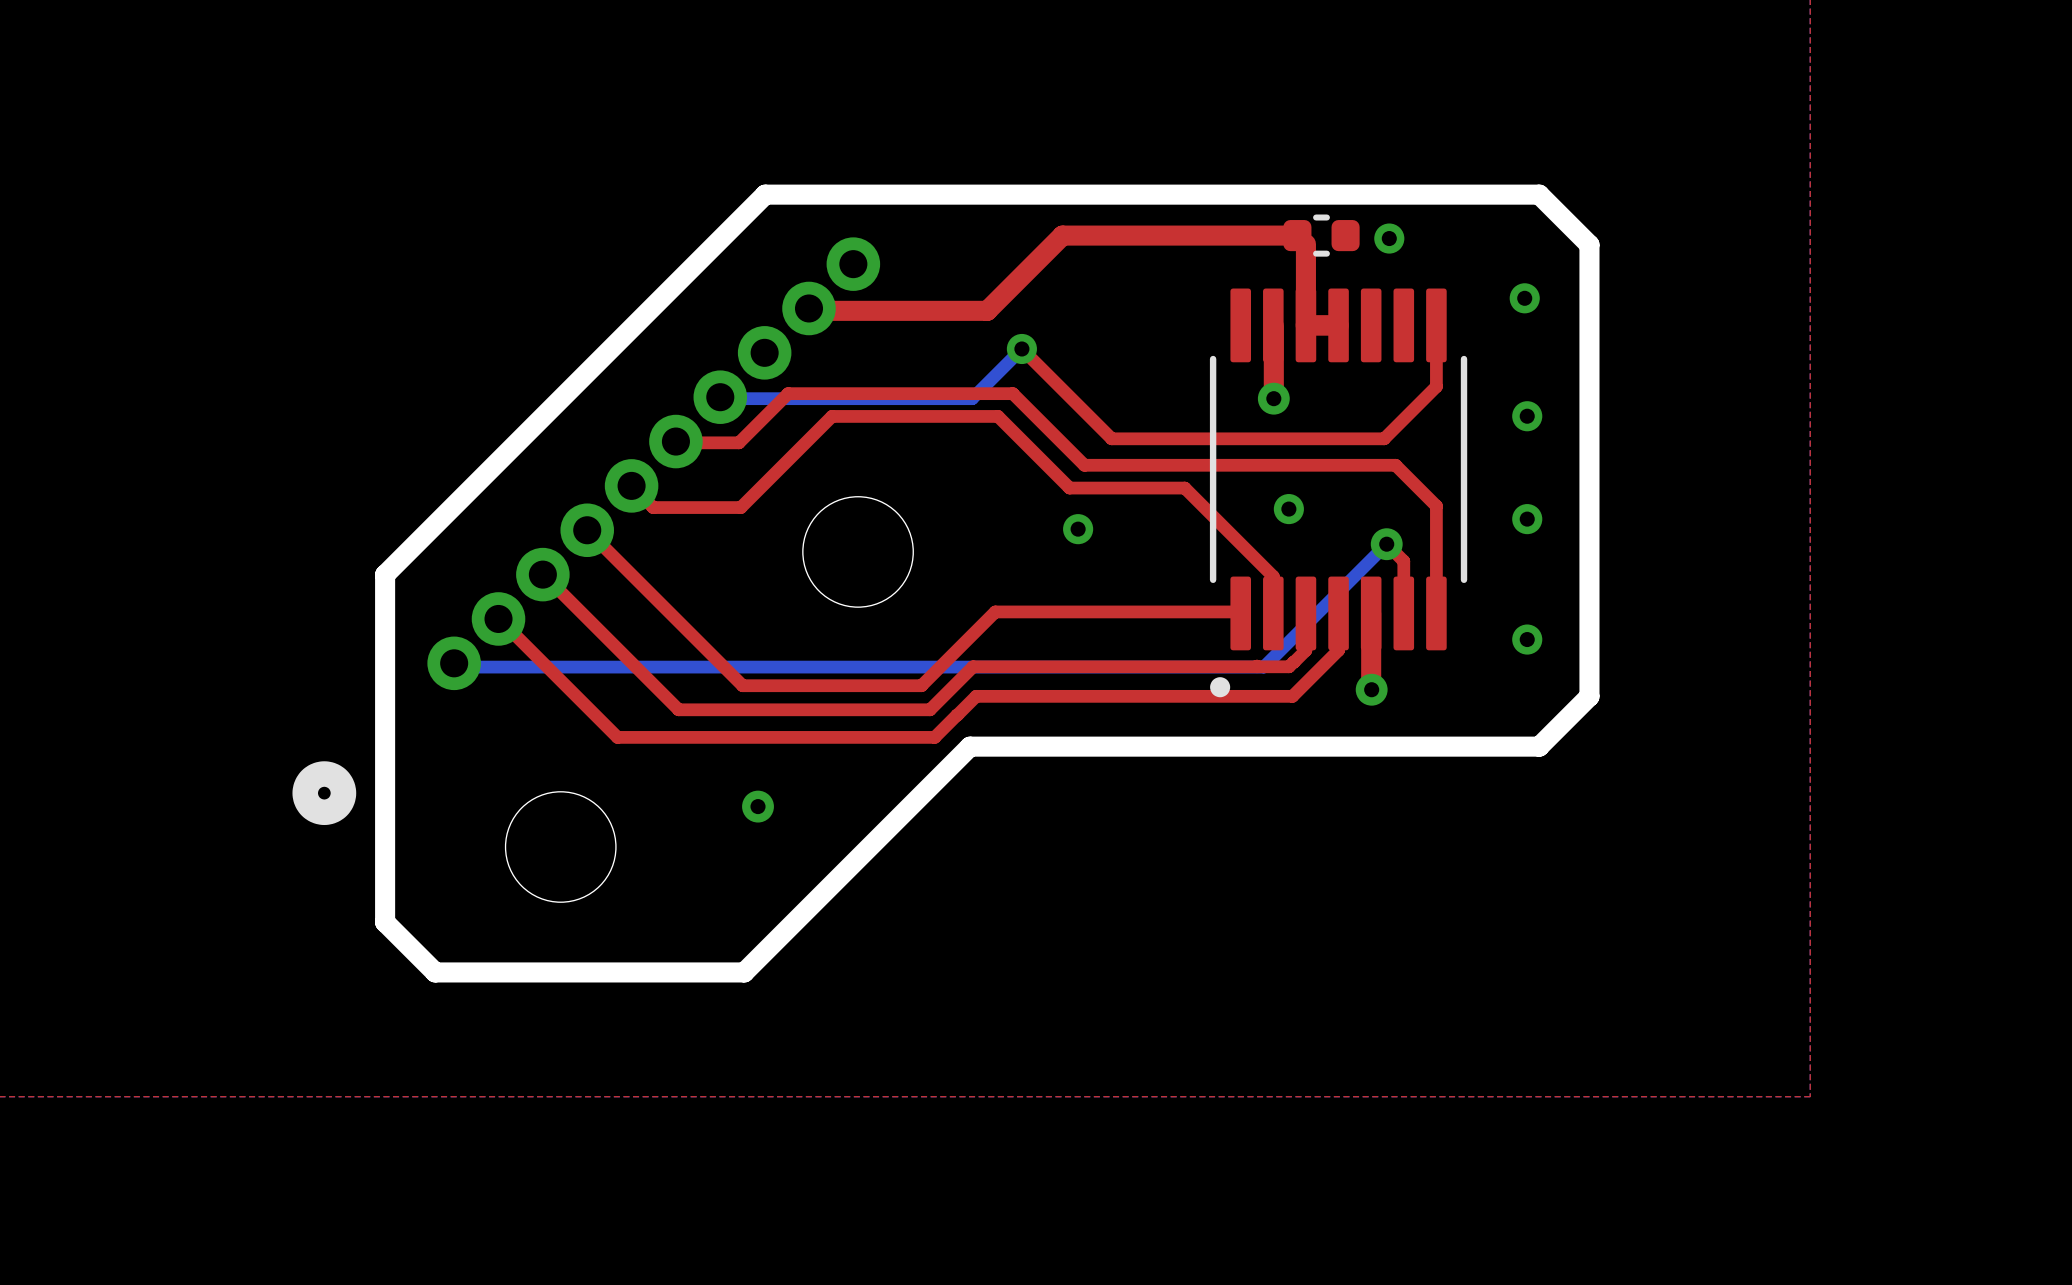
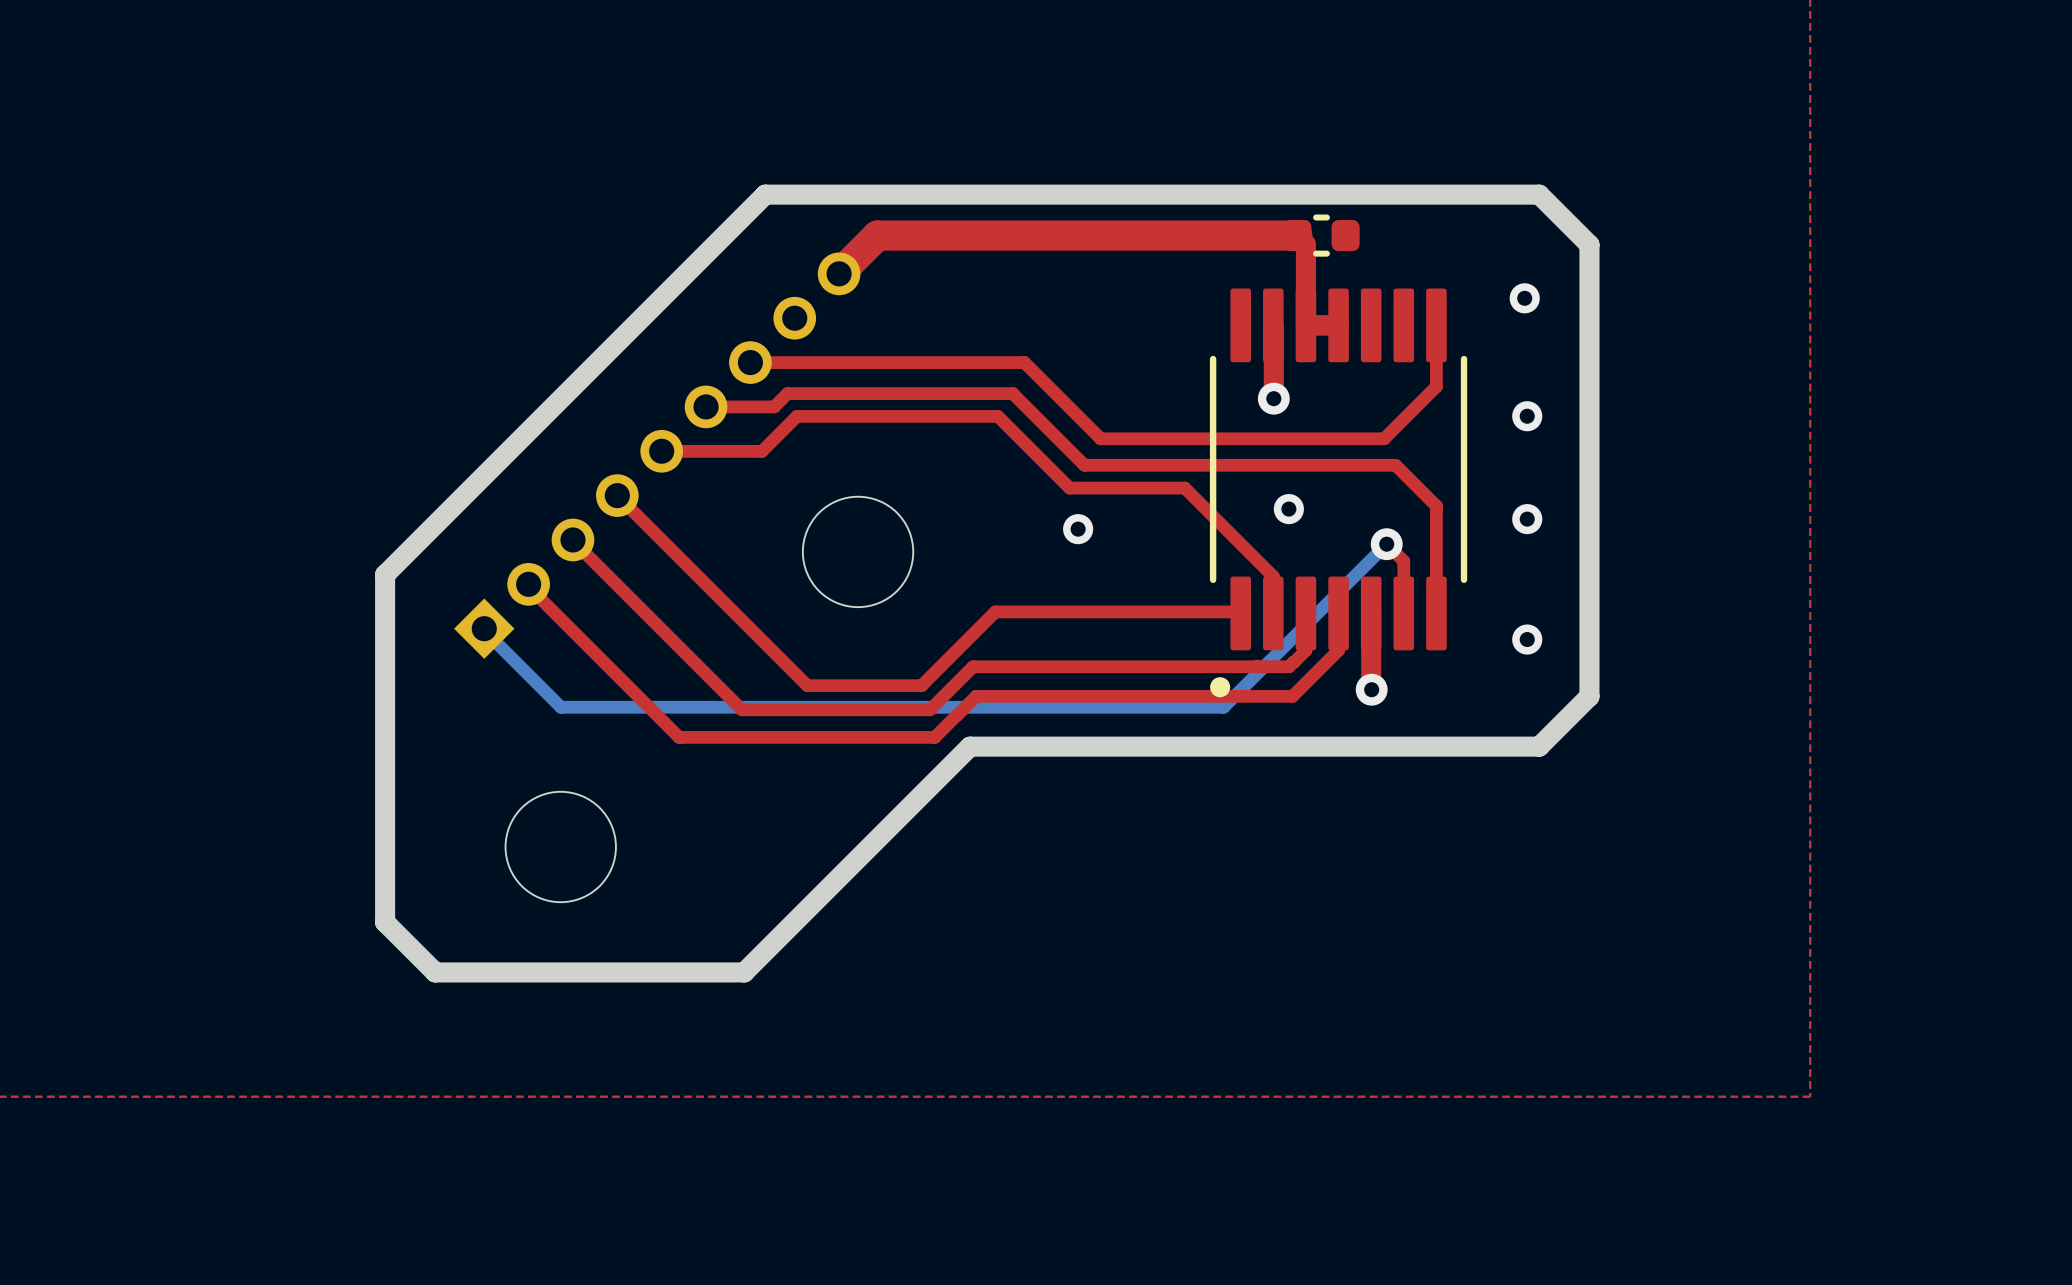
top track: (1062, 235) (987, 310) (811, 310) -> (1062, 235) (877, 235) (839, 273)
top track width: thin (1062, 235) (1297, 235) -> thick (1062, 235) (1297, 235)
via: (1389, 238) -> none
top track: (1021, 348) (1111, 438) -> (750, 362) (1024, 362) (1100, 438) (1111, 438)
bottom track: (1021, 348) (972, 398) (721, 398) -> none
via: (1021, 348) -> none
top track: (788, 393) (738, 442) (677, 442) -> (787, 393) (774, 406) (706, 406)
top track: (832, 416) (740, 507) (653, 507) (631, 485) -> (832, 416) (796, 416) (761, 451) (661, 451)
part: none -> (657, 455)
top track: (587, 530) (742, 685) (807, 685) -> (617, 495) (807, 685)
part: (586, 531) -> none
top track: (543, 574) (678, 709) (741, 709) -> (572, 540) (741, 709)
top track: (499, 618) (617, 737) (679, 737) -> (528, 586) (679, 737)
bottom track: (454, 663) (457, 667) (1263, 667) -> (484, 630) (560, 707) (1223, 707) (1263, 667)
via: (758, 806) -> none

